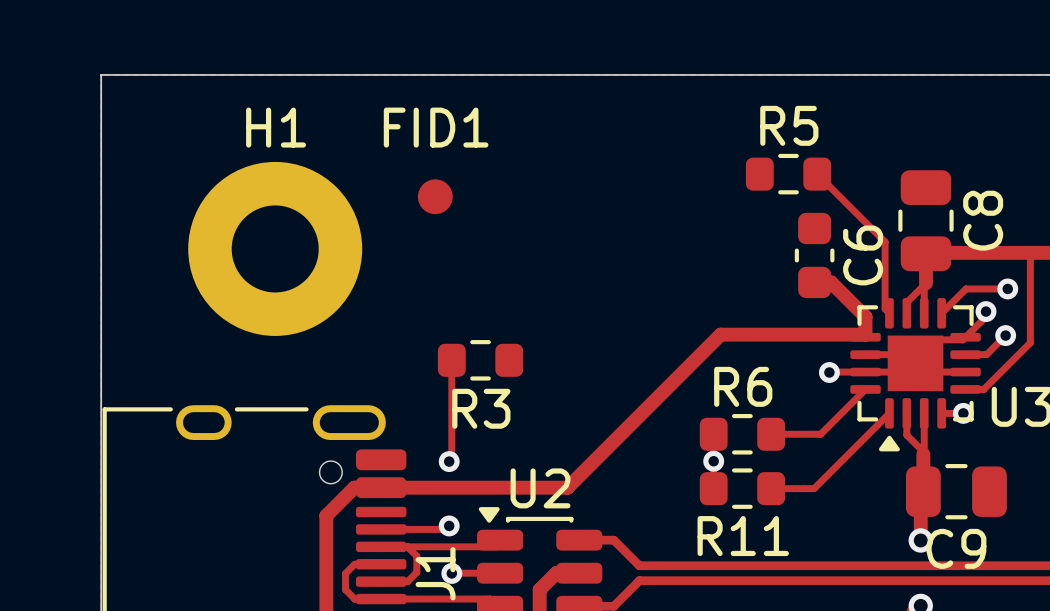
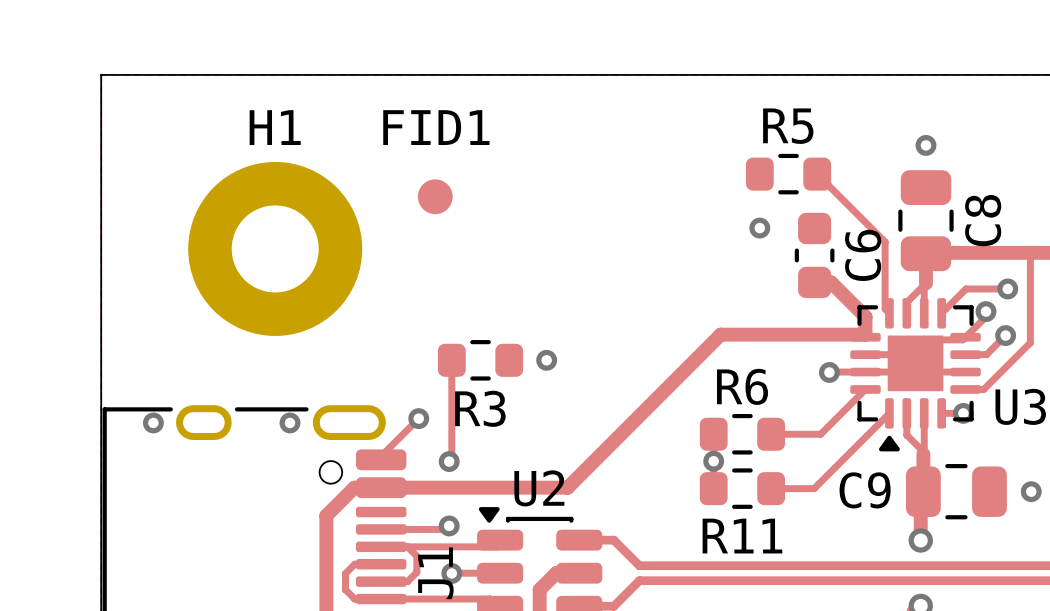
via: none -> (925, 145)
via: none -> (759, 228)
via: none -> (546, 360)
track: none -> (418, 418) (381, 456)
via: none -> (418, 418)
via: none -> (153, 422)
via: none -> (289, 422)
via: none -> (1031, 491)
C9 name position: C9 (956, 548) -> C9 (865, 490)

